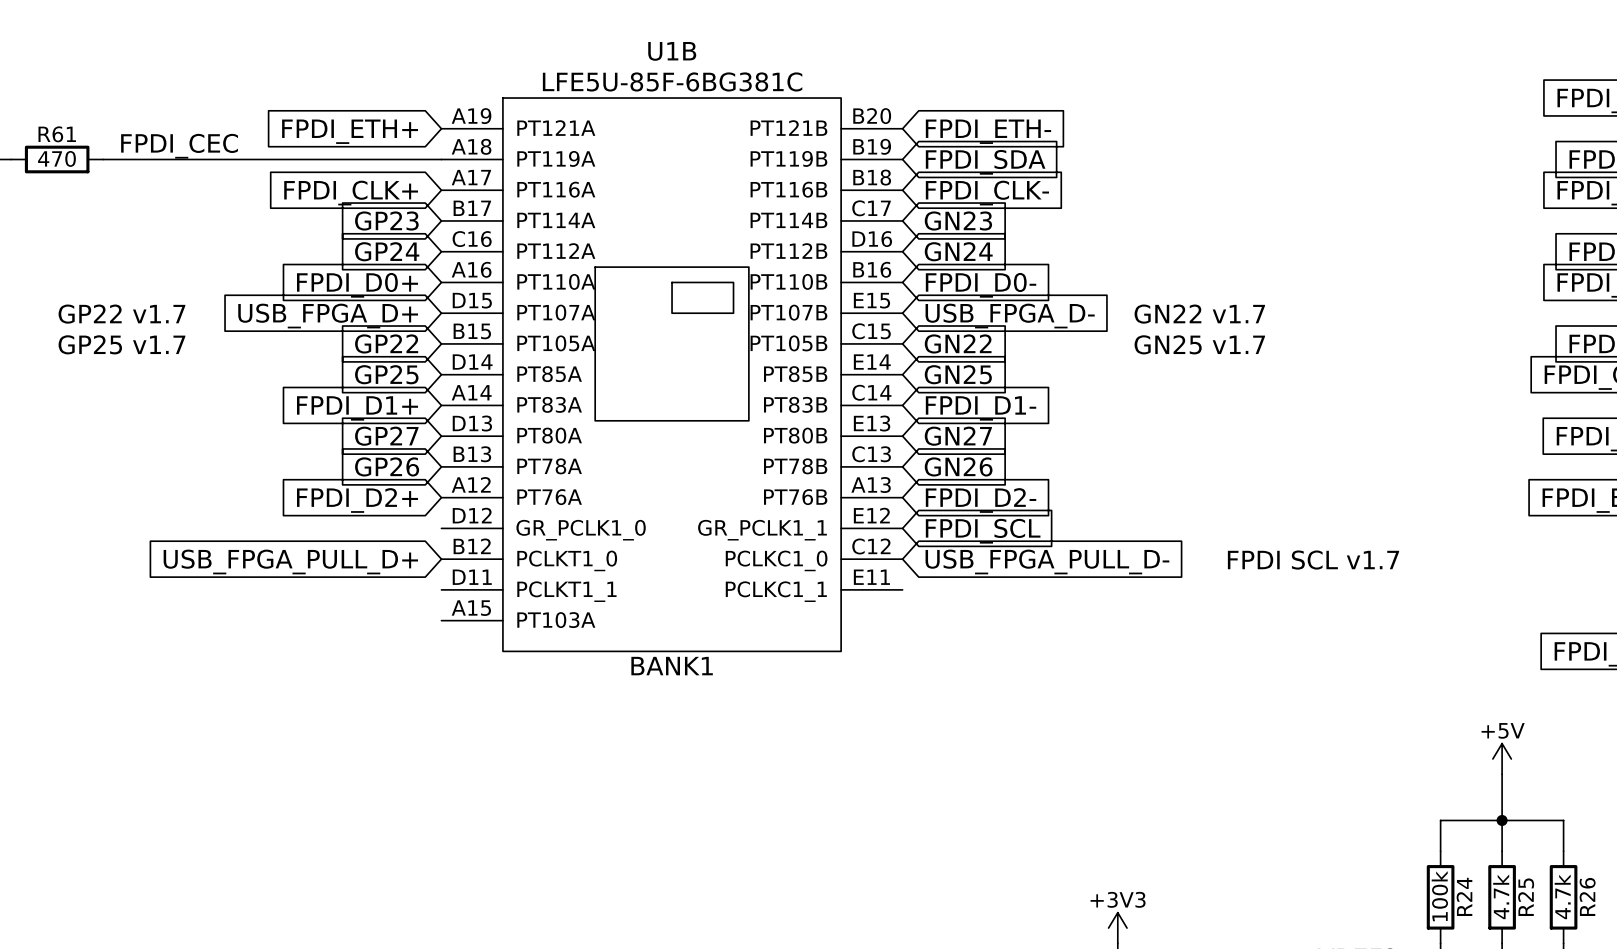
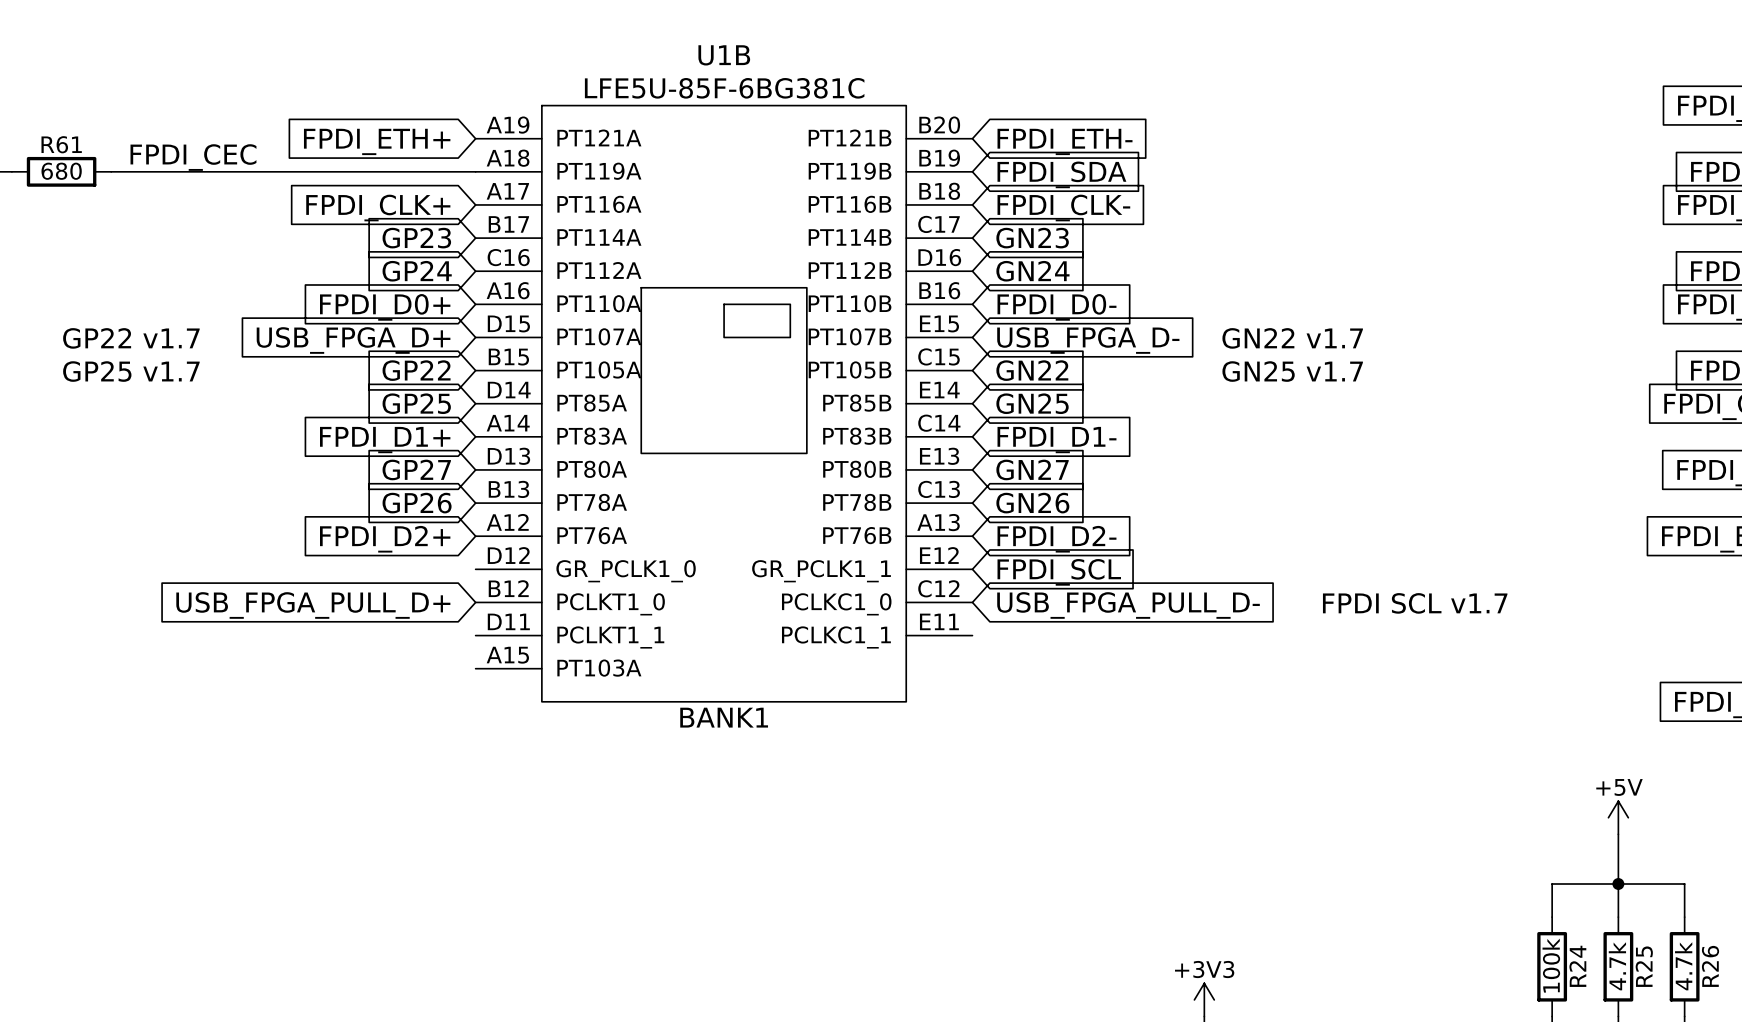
R61 value: 470 (56, 158) -> 680 (61, 171)

